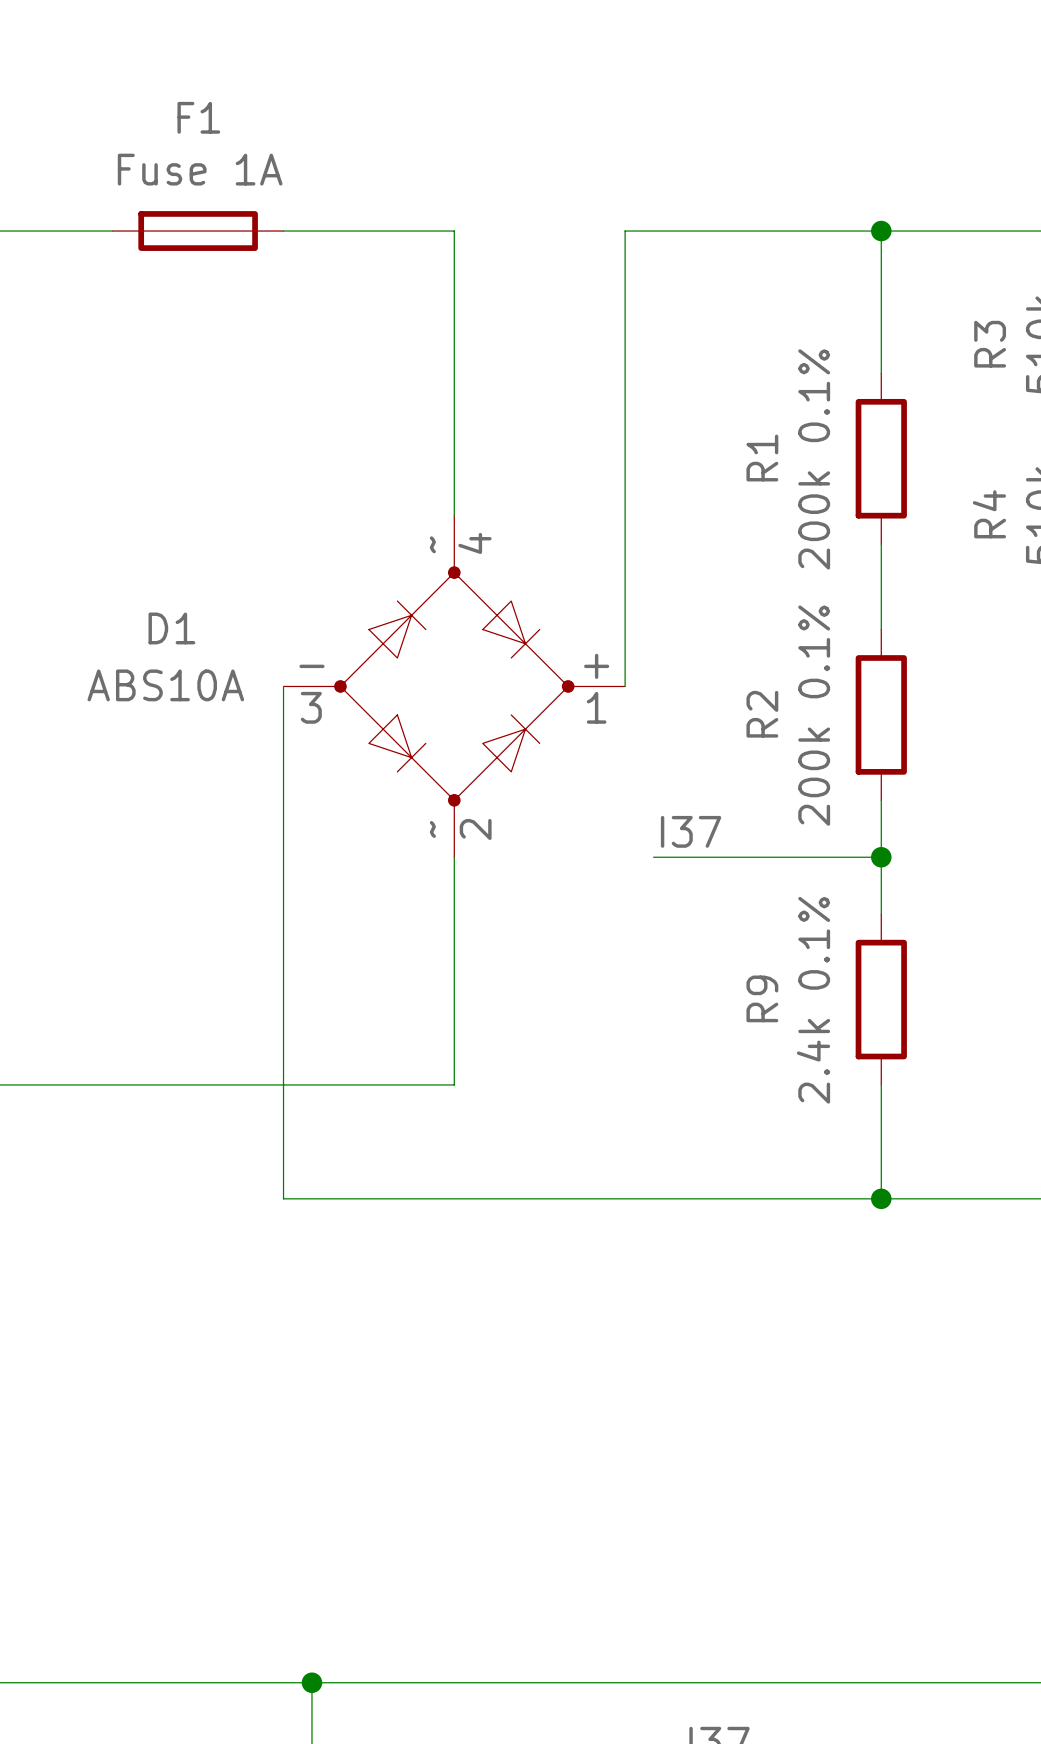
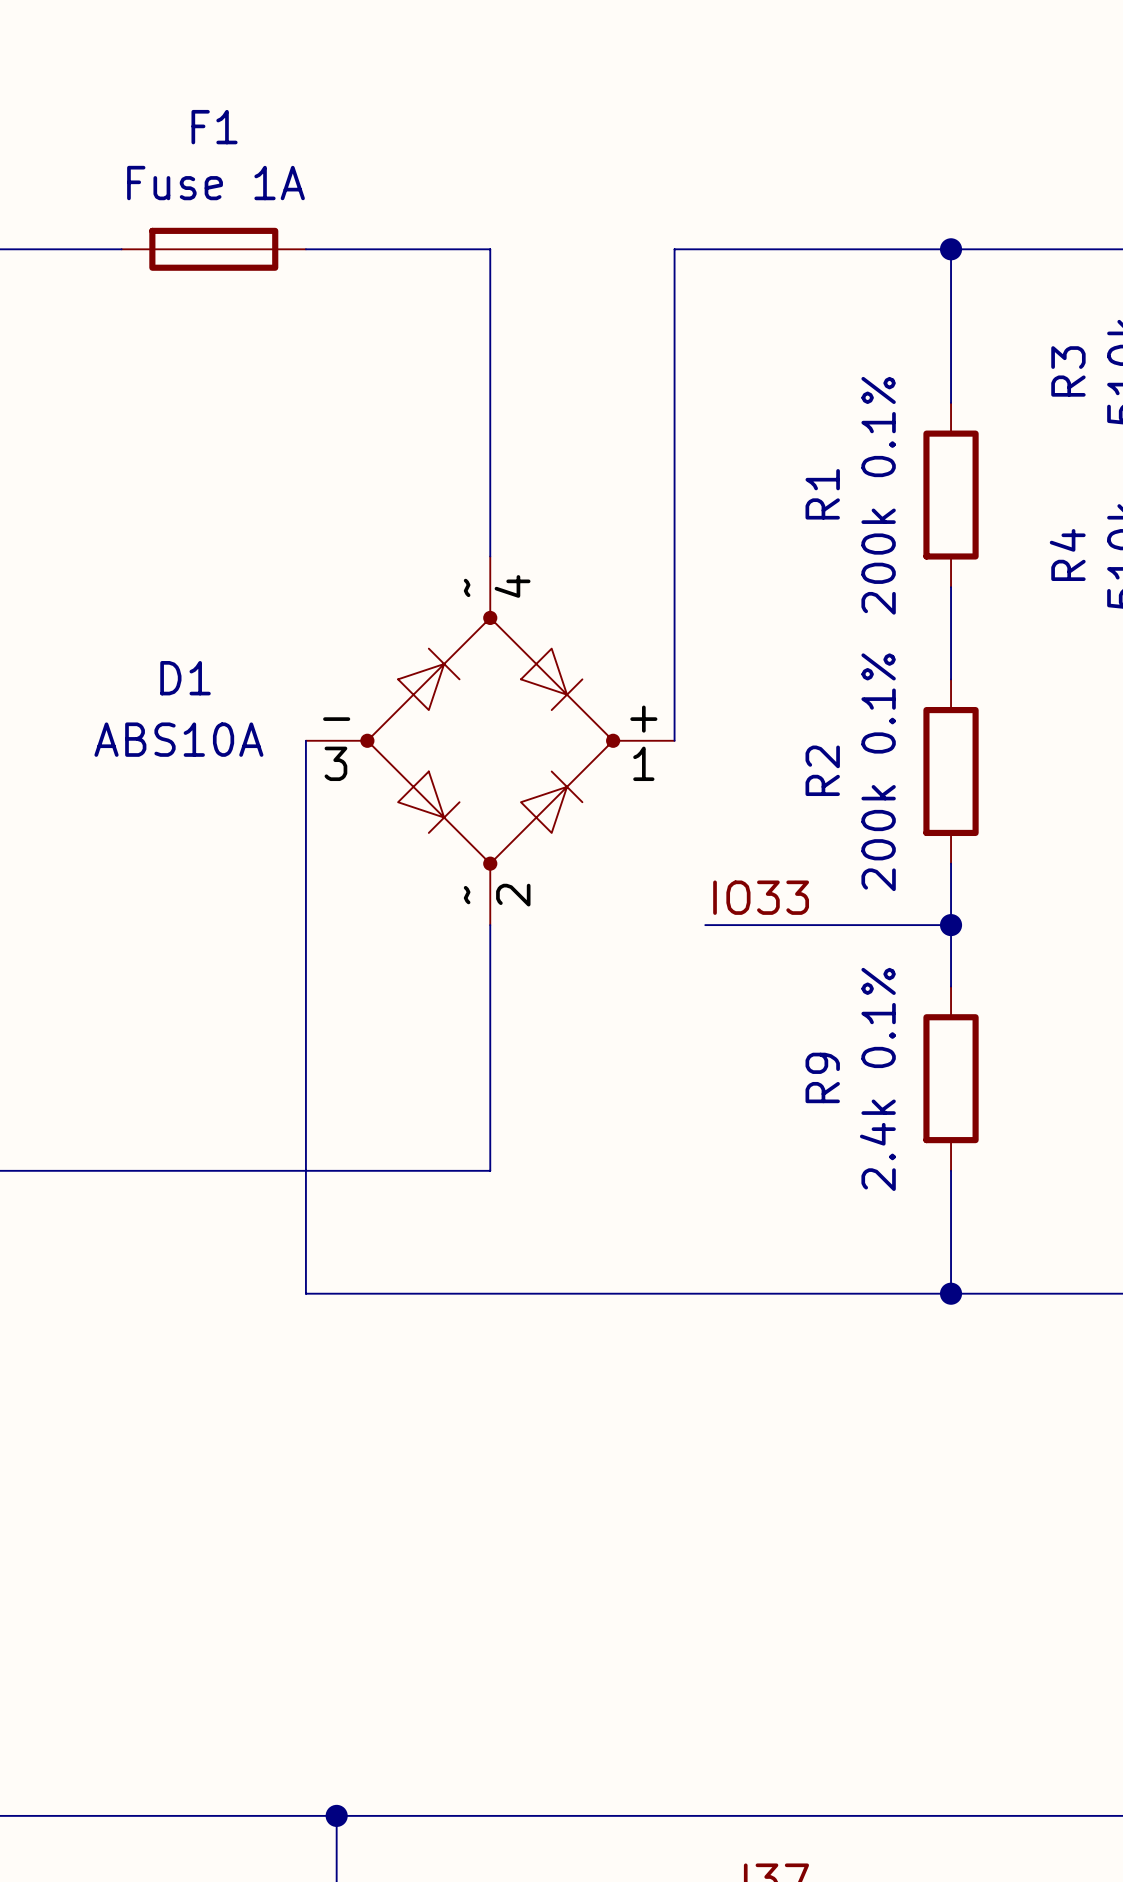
label: I37 (691, 831) -> IO33 (761, 897)

